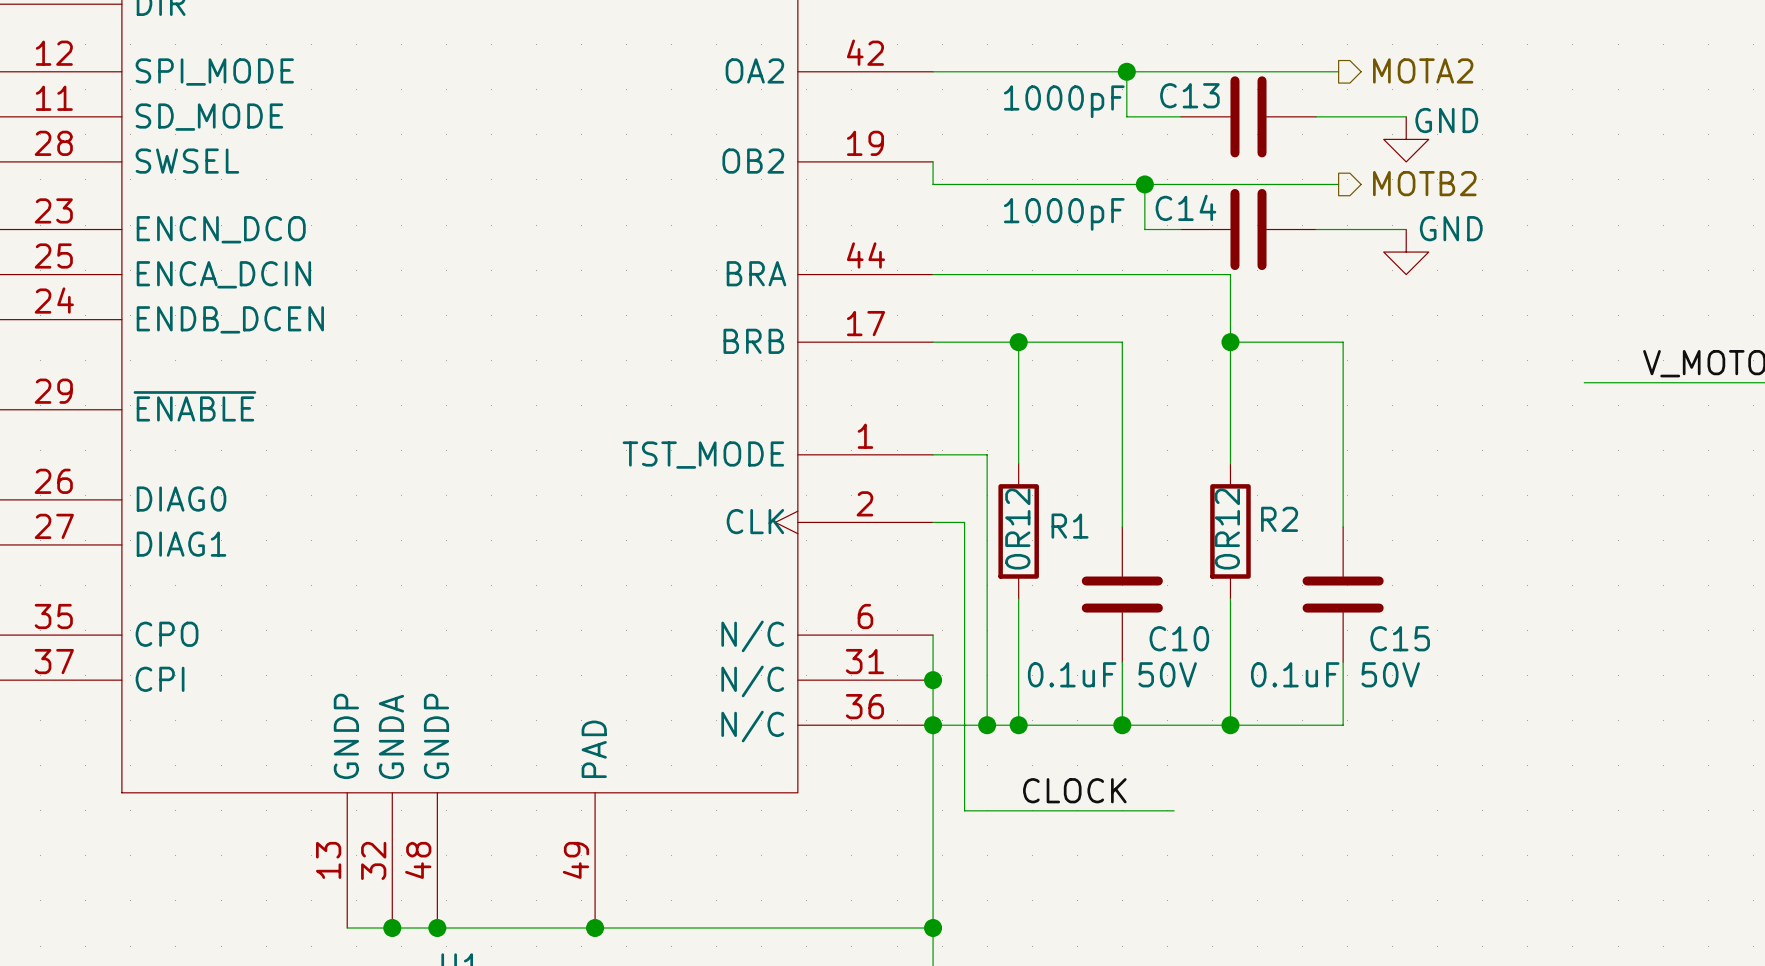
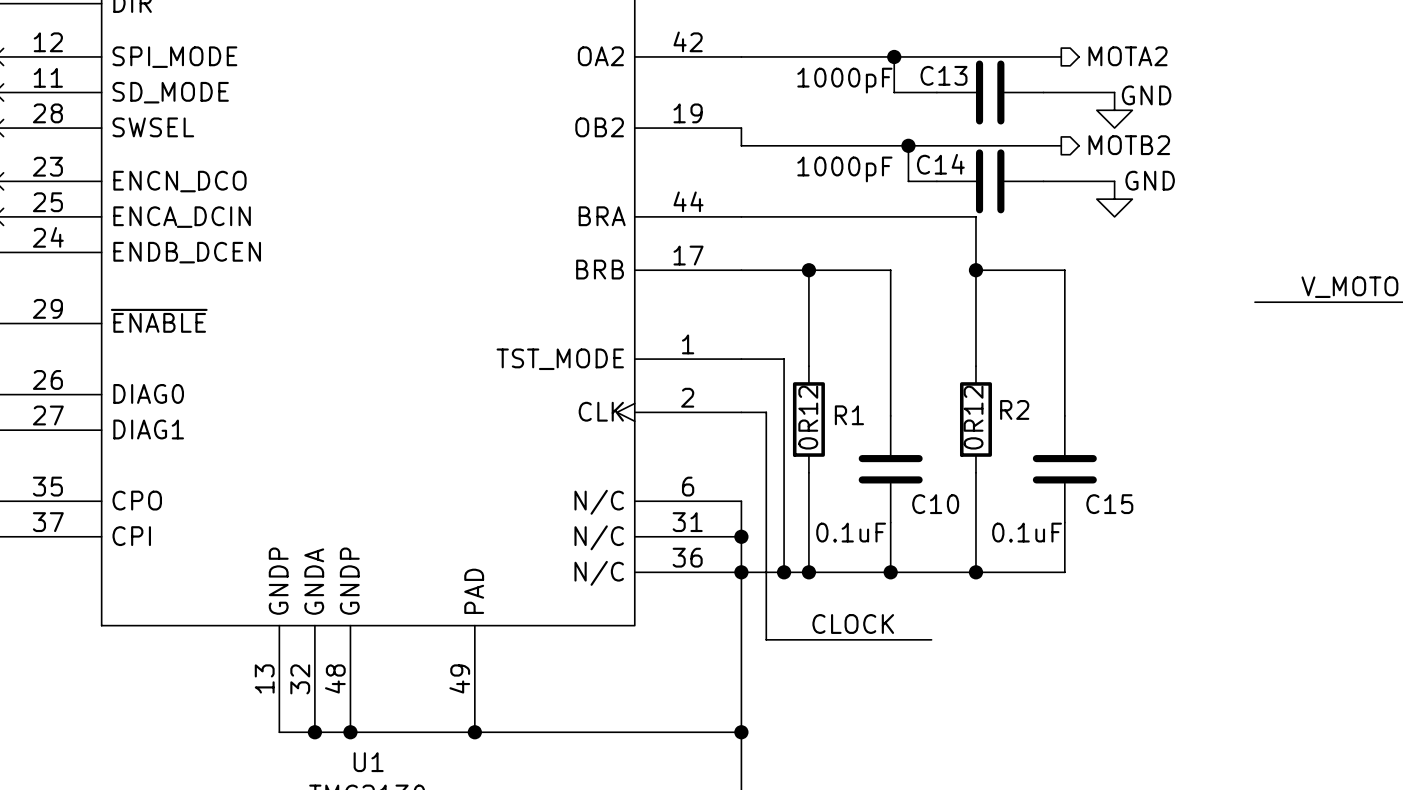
C10 value: 0.1uF 50V (1112, 674) -> 0.1uF (851, 532)
C15 value: 0.1uF 50V (1335, 674) -> 0.1uF (1027, 532)

